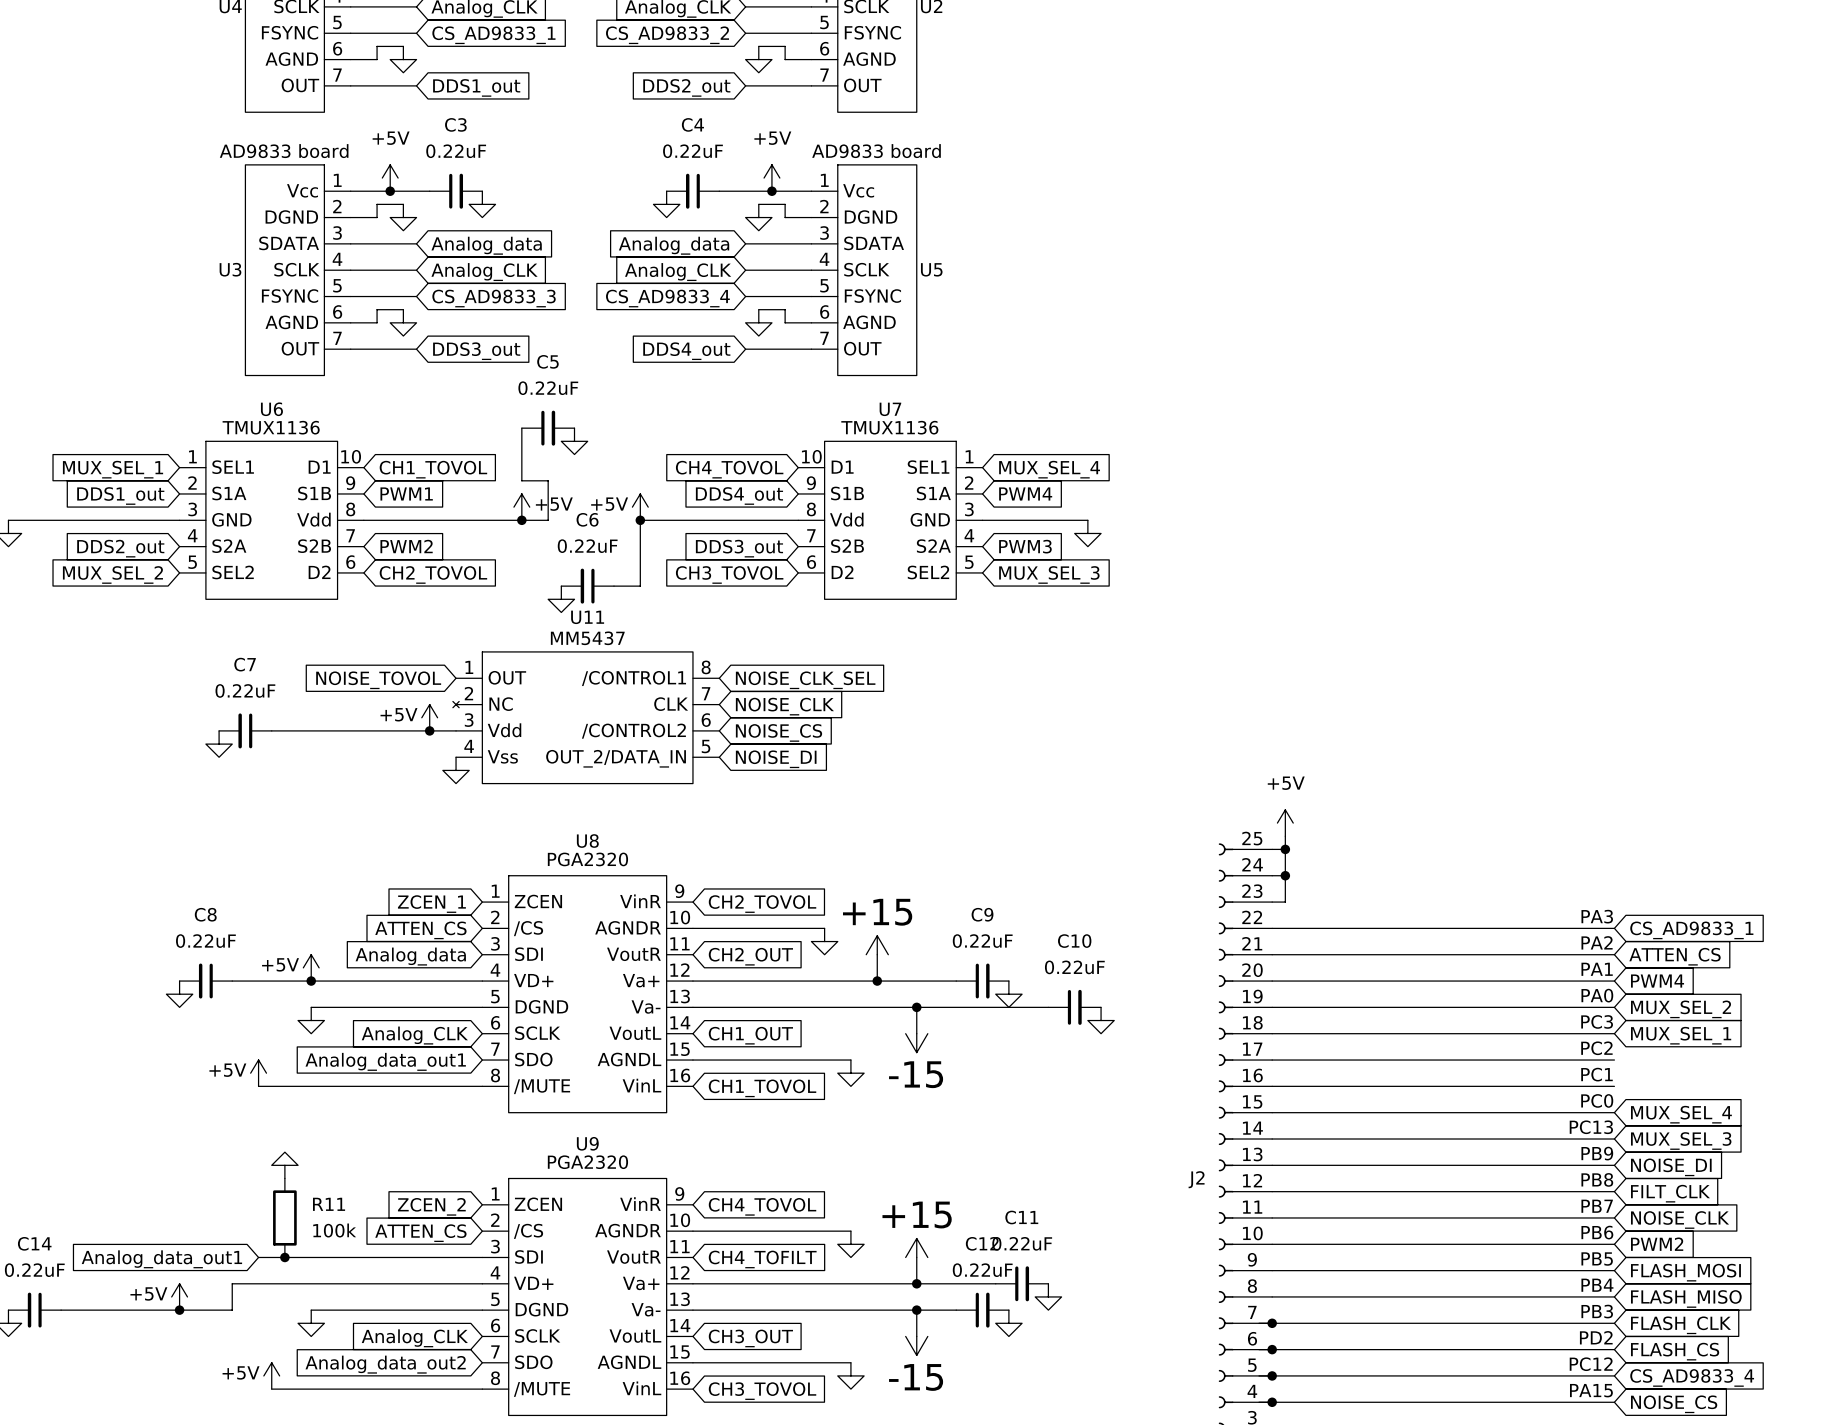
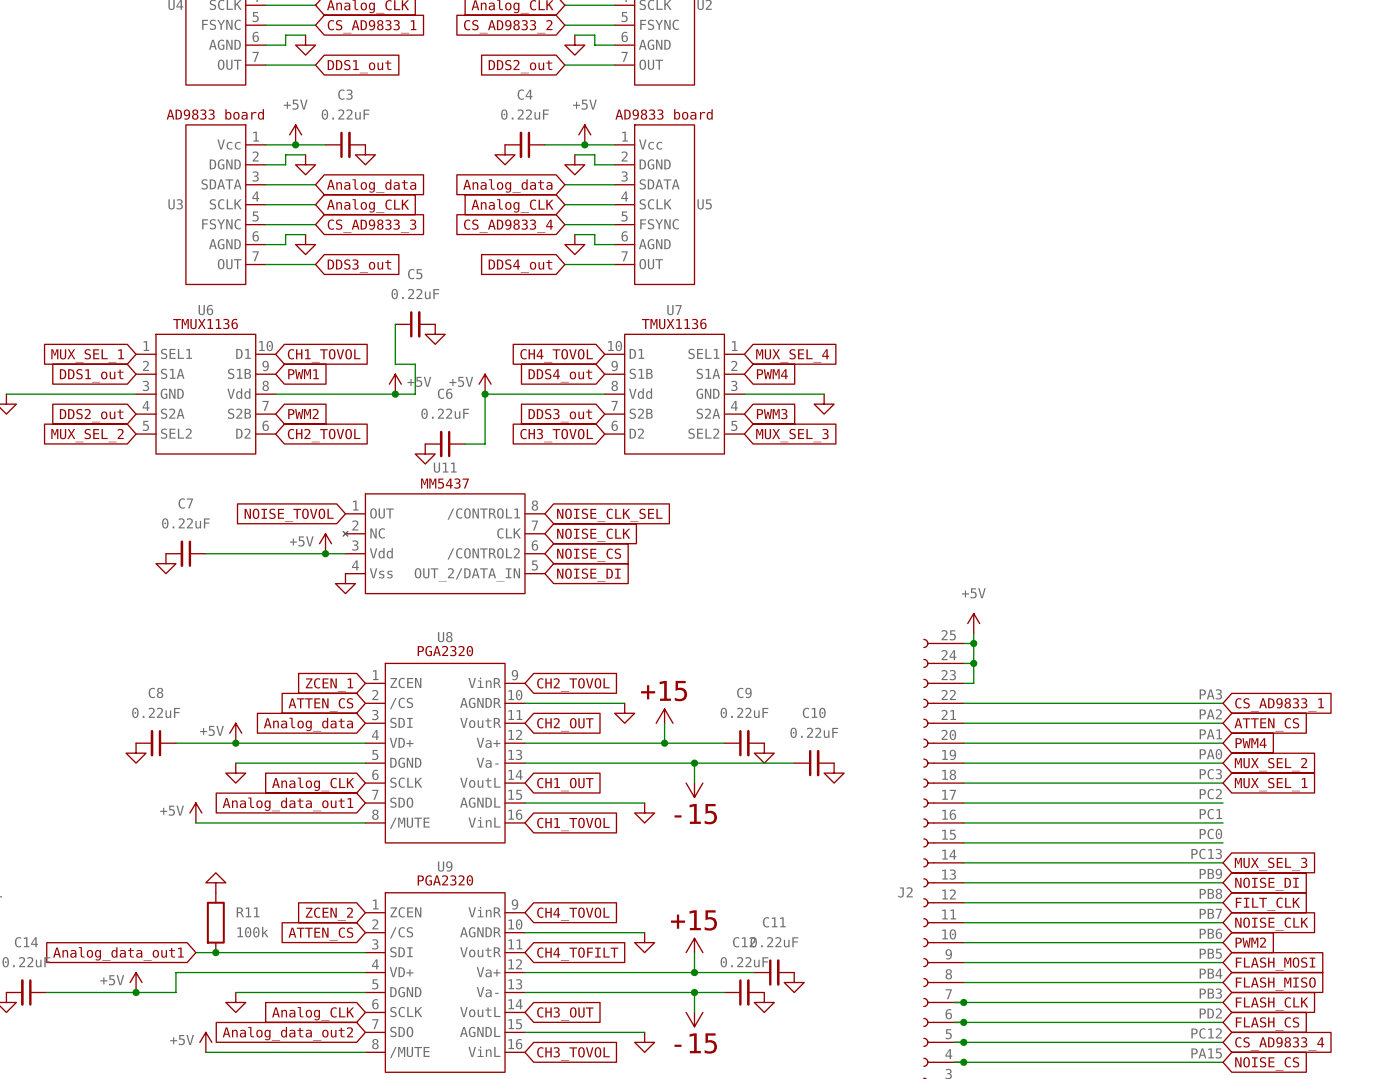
global label: MUX_SEL_4 (1681, 1114) -> none

